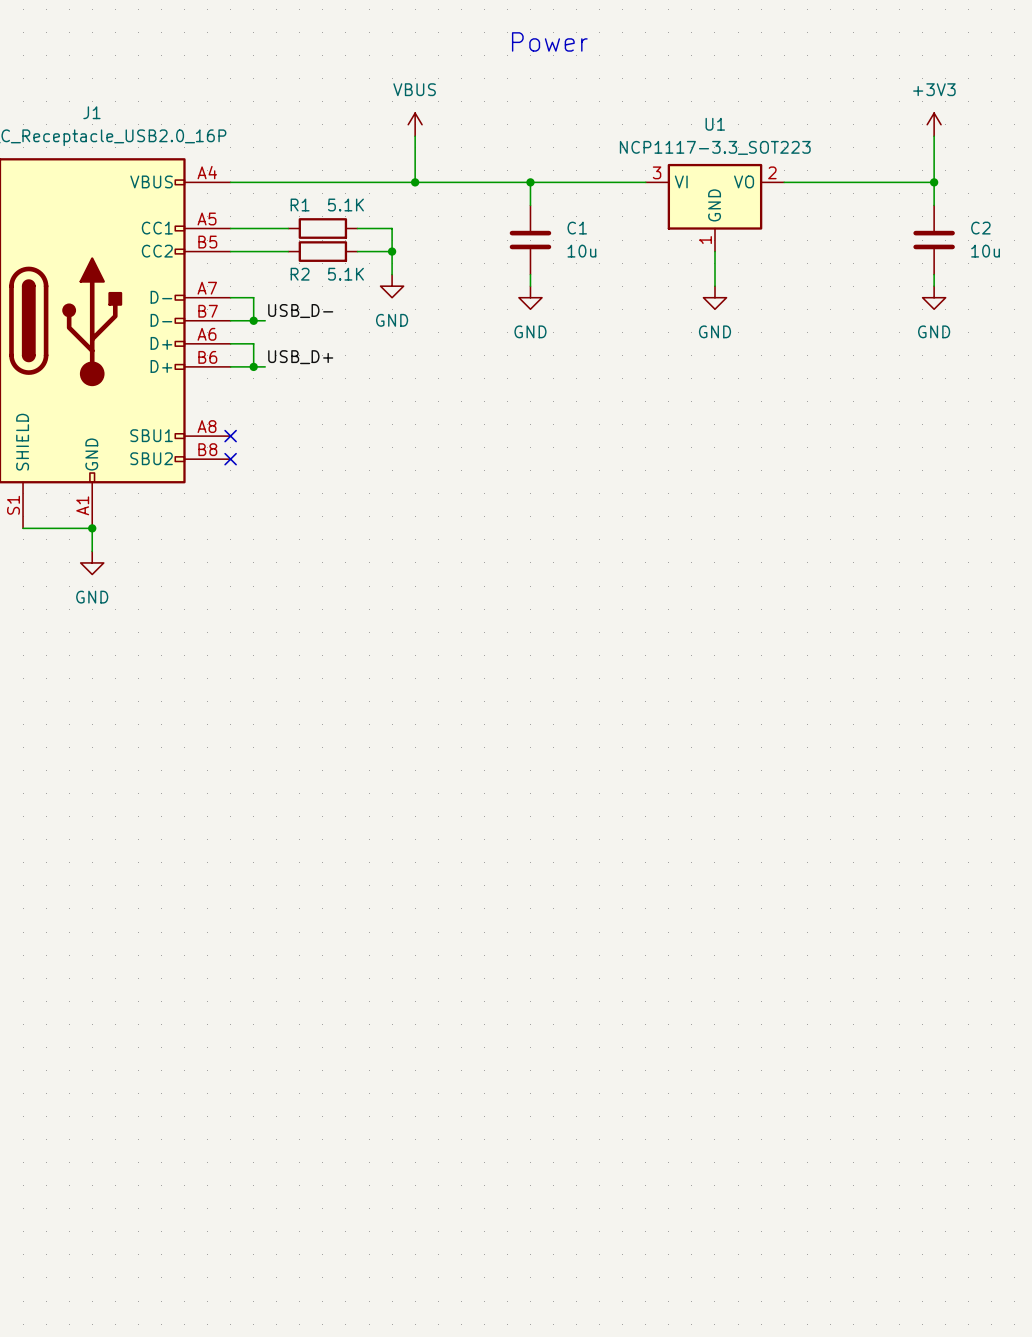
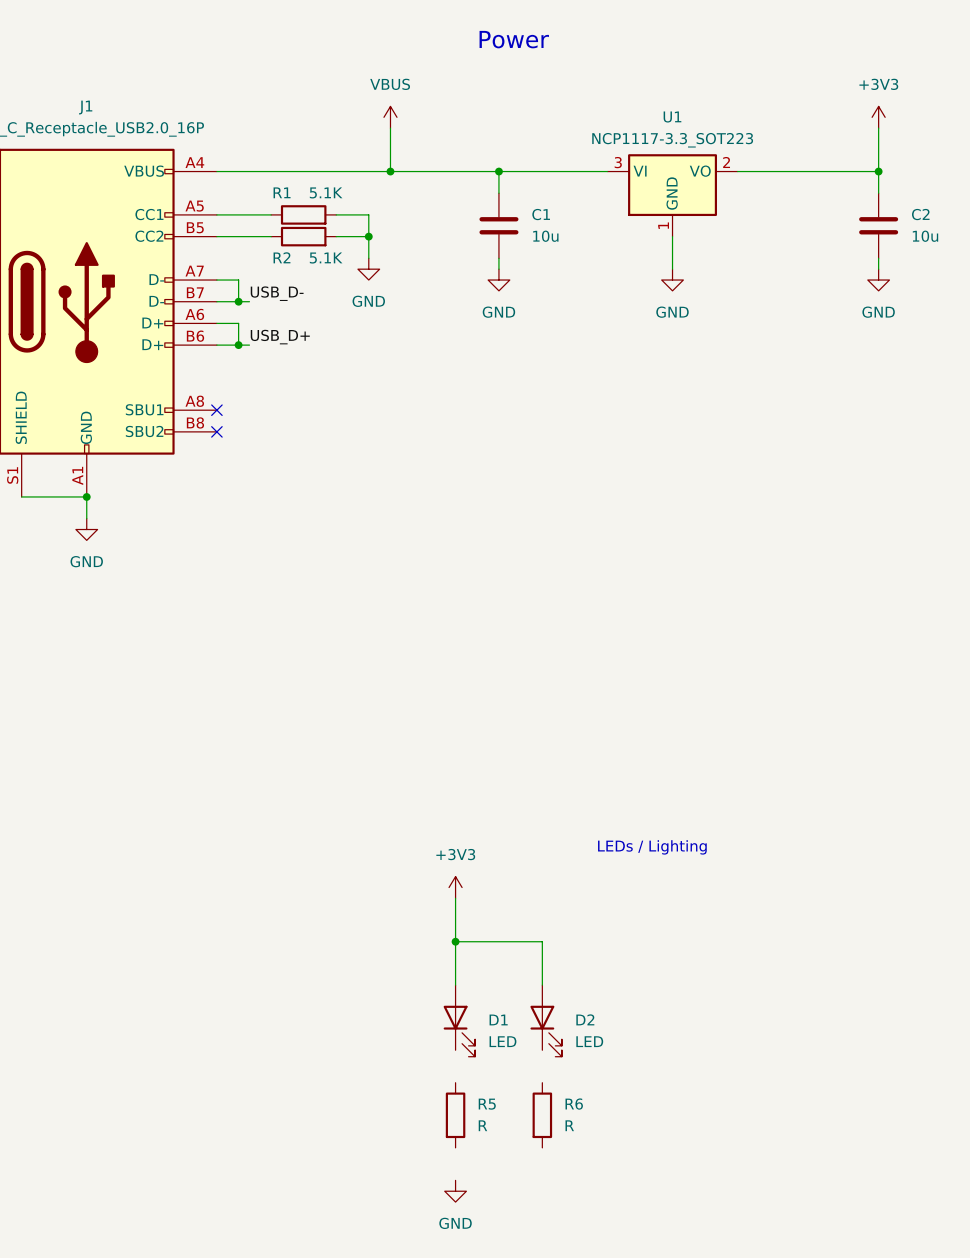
text: none -> LEDs / Lighting (652, 847)
power symbol: none -> +3V3 (455, 887)
wire: none -> (455, 898) (455, 985)
wire: none -> (455, 941) (542, 941) (542, 985)
junction: none -> (455, 941)
D1: none -> LED (459, 1020)
D2: none -> LED (546, 1020)
R5: none -> R (455, 1115)
R6: none -> R (542, 1115)
power symbol: none -> GND (455, 1191)

